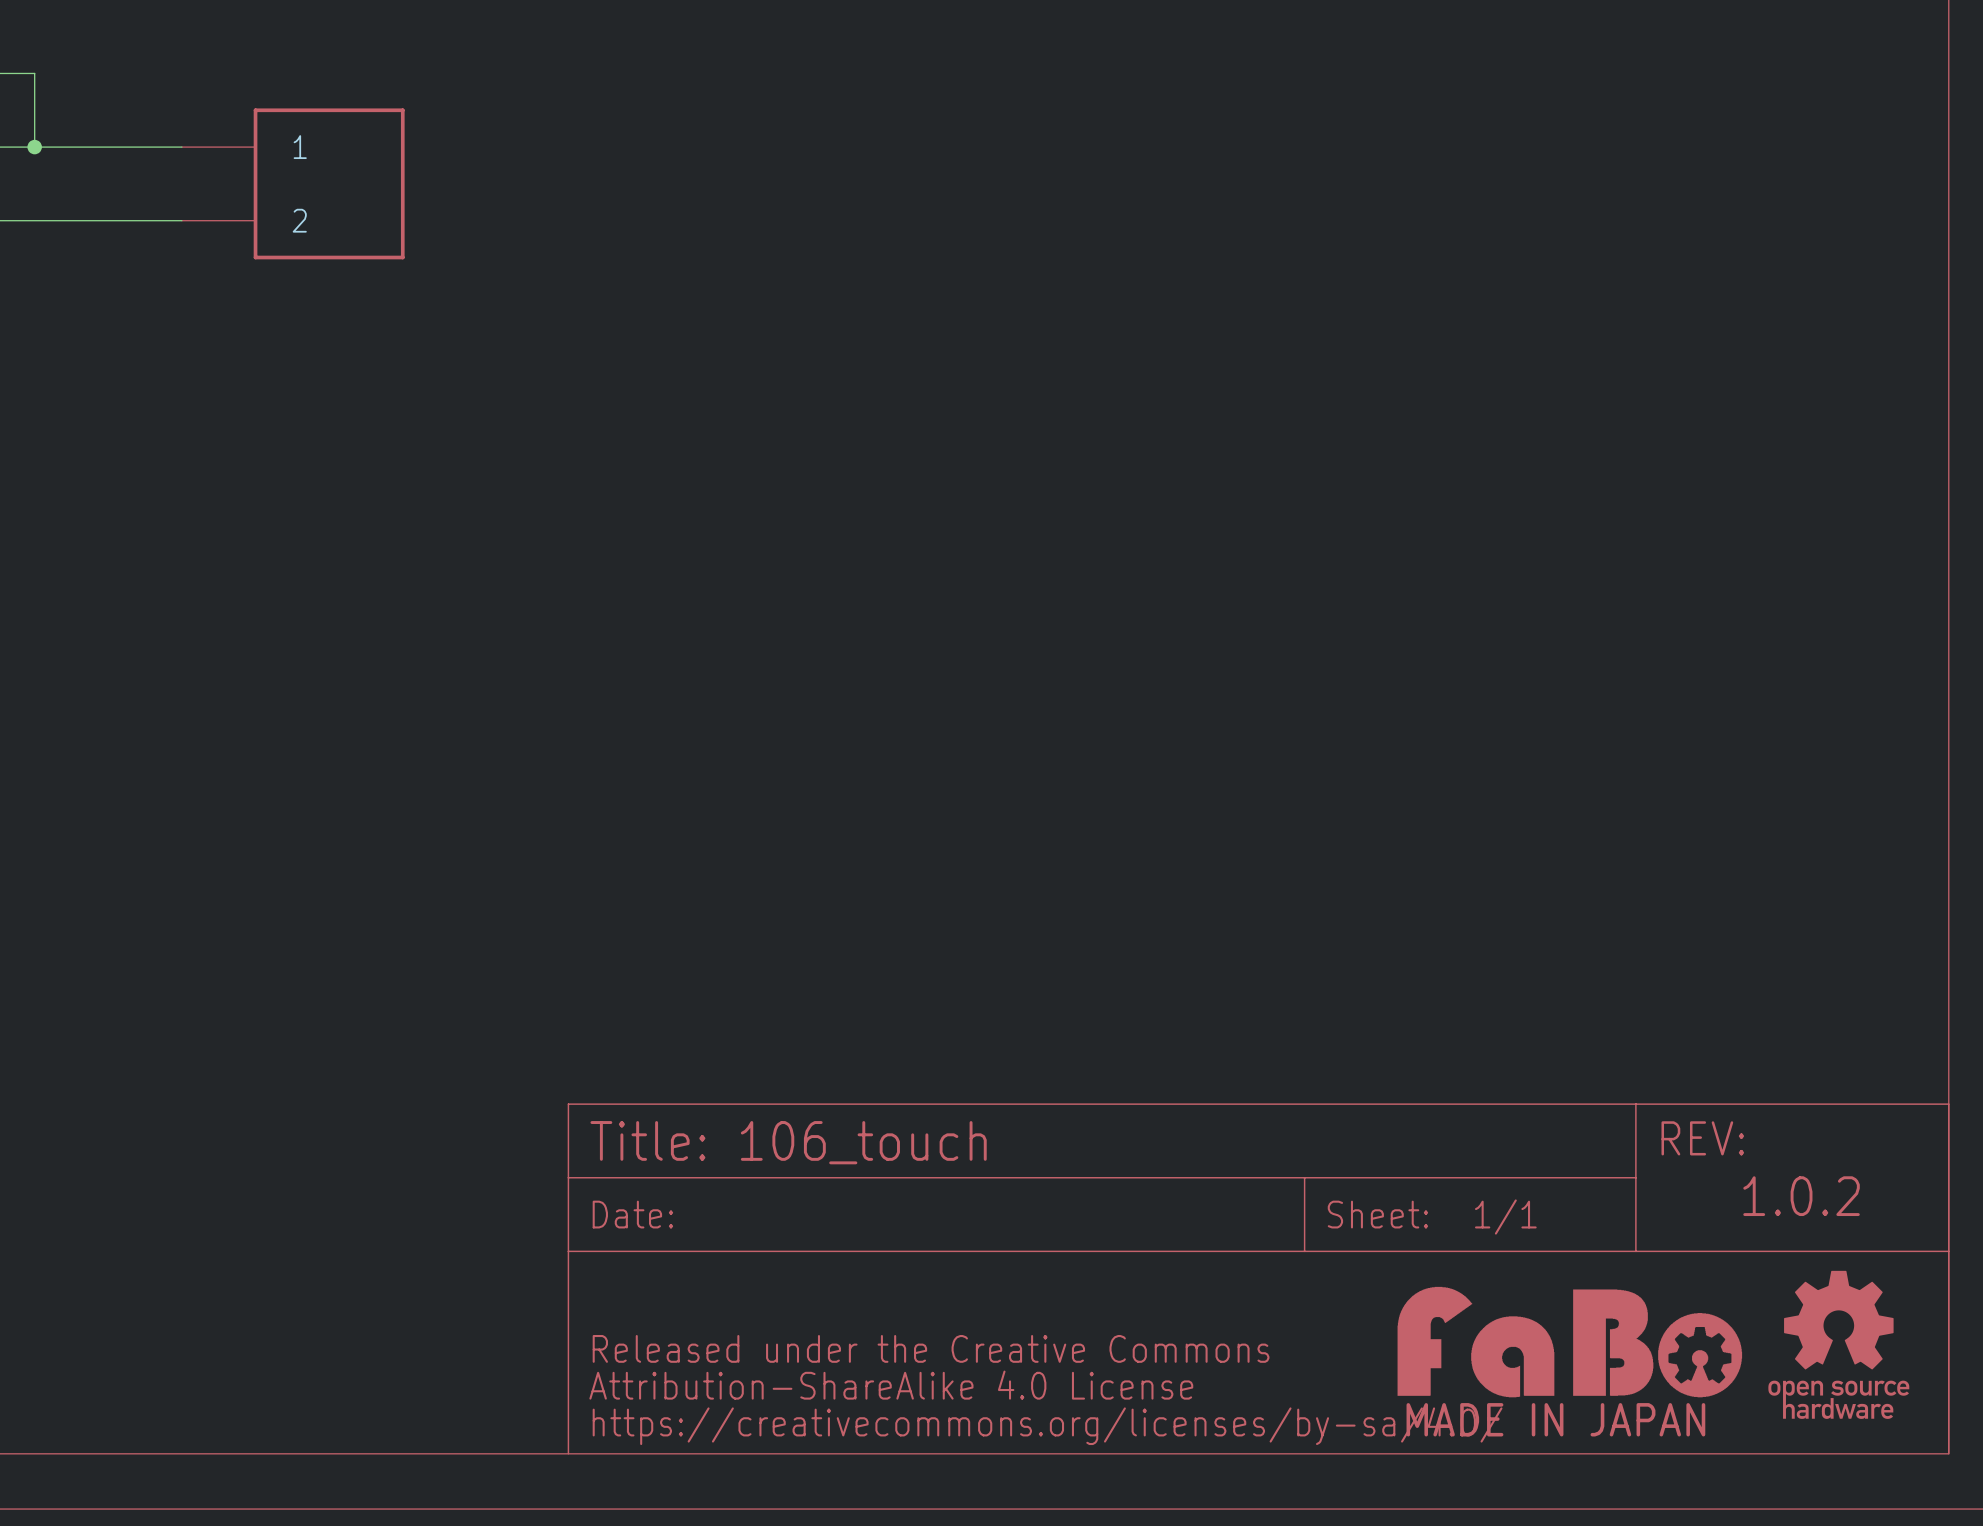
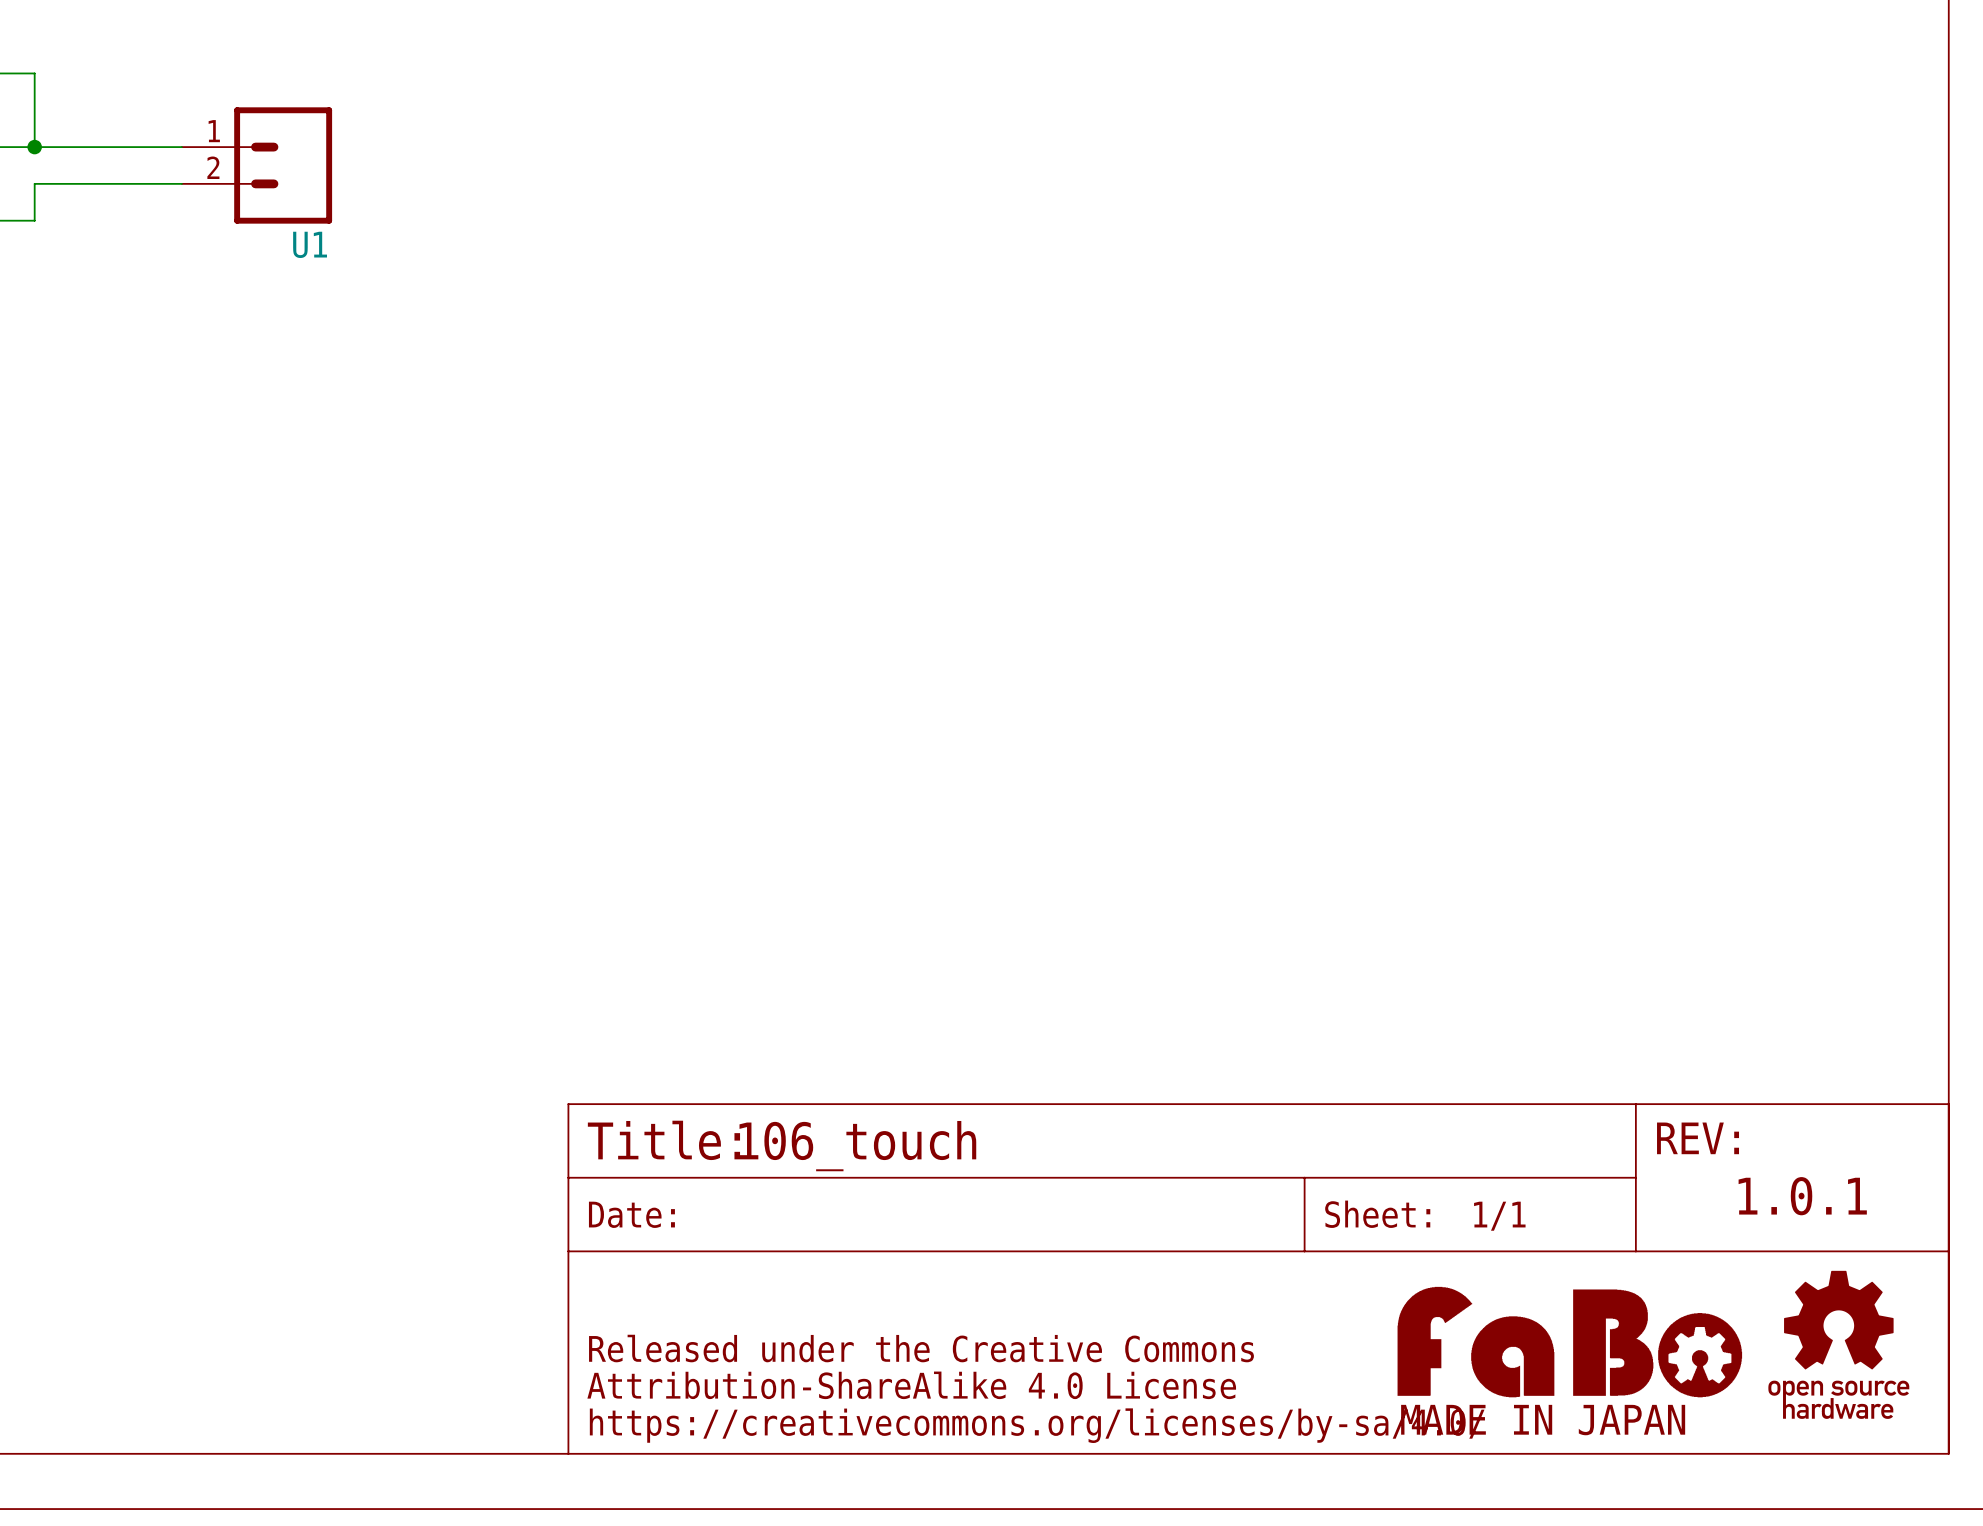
U1: none -> (257, 165)
part: (293, 183) -> none
wire: (34, 220) (181, 220) -> (34, 220) (34, 183) (181, 183)
text: 1.0.2 (1801, 1196) -> 1.0.1 (1802, 1196)

